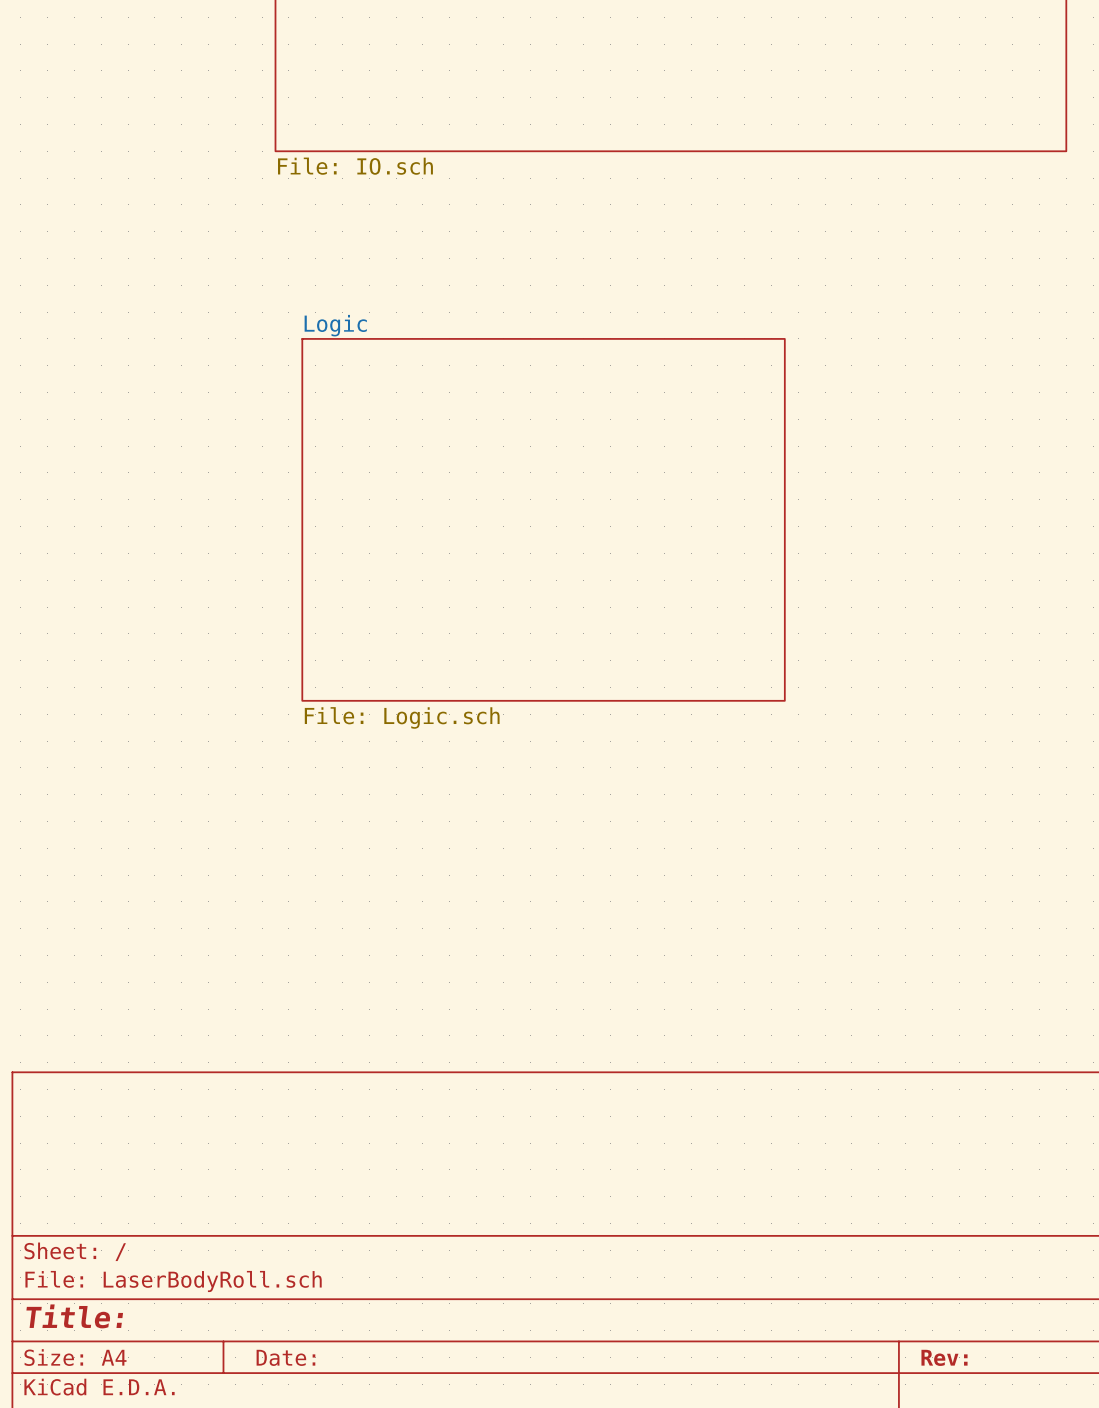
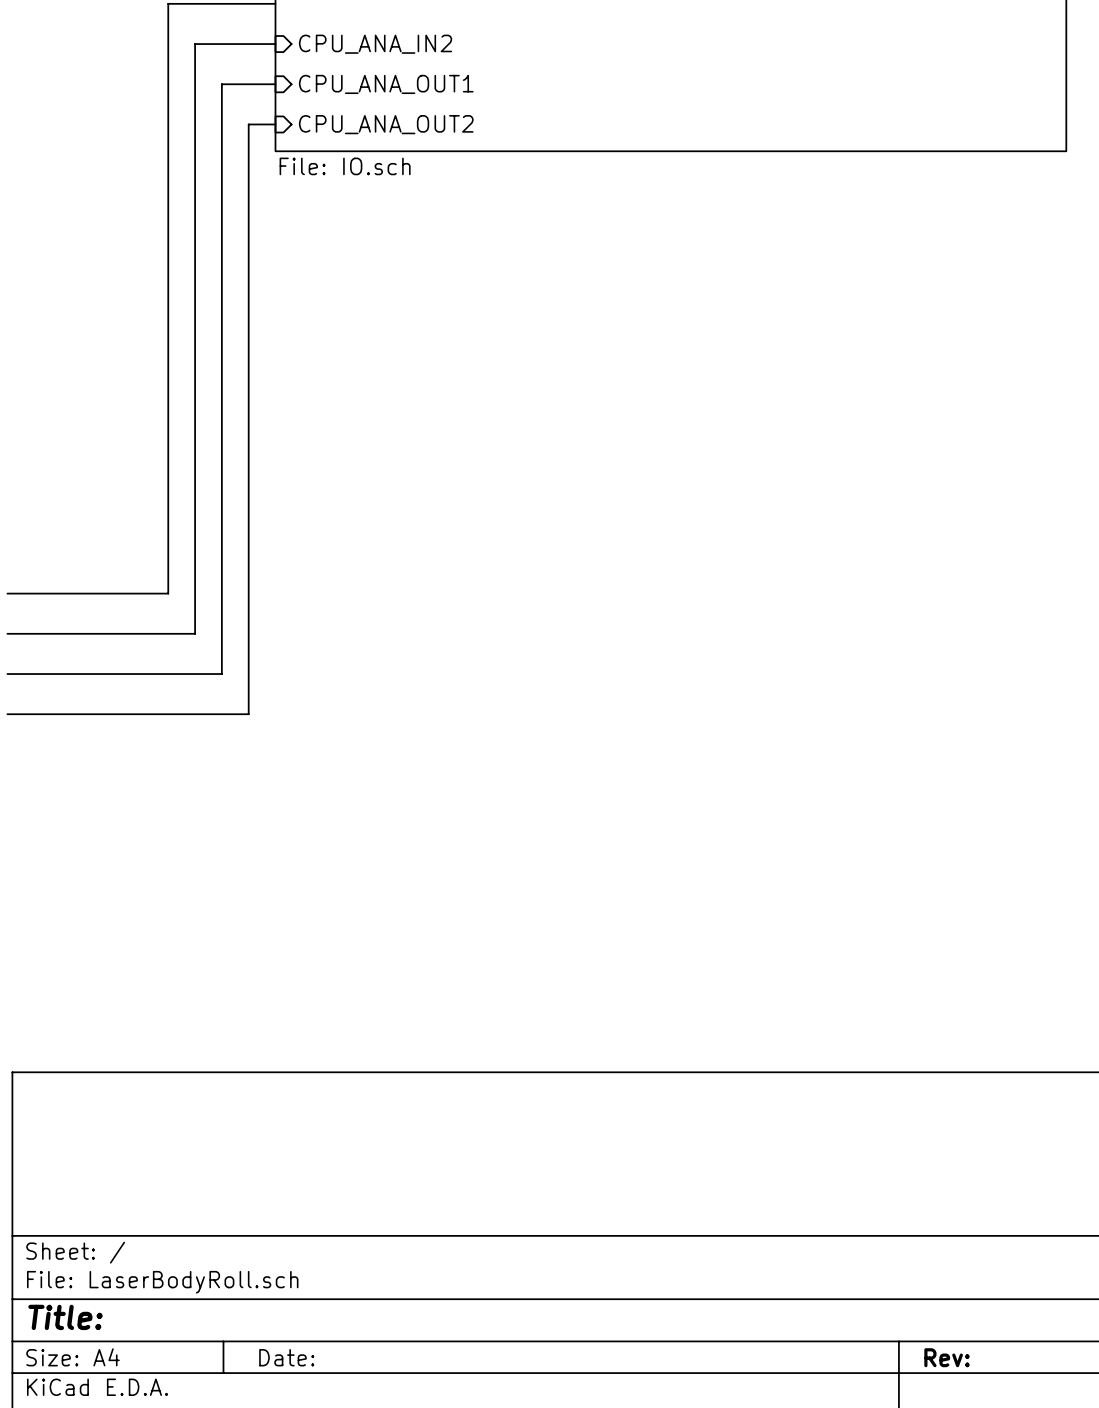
wire: none -> (275, 3) (168, 3) (168, 593) (7, 593)
wire: none -> (275, 44) (195, 44) (195, 633) (7, 633)
sheet pin: none -> CPU_ANA_IN2 (375, 44)
wire: none -> (275, 84) (221, 84) (221, 674) (7, 674)
sheet pin: none -> CPU_ANA_OUT1 (386, 84)
wire: none -> (275, 124) (248, 124) (248, 714) (7, 714)
sheet pin: none -> CPU_ANA_OUT2 (386, 124)
sheet Logic: File: Logic.sch (543, 519) -> none

